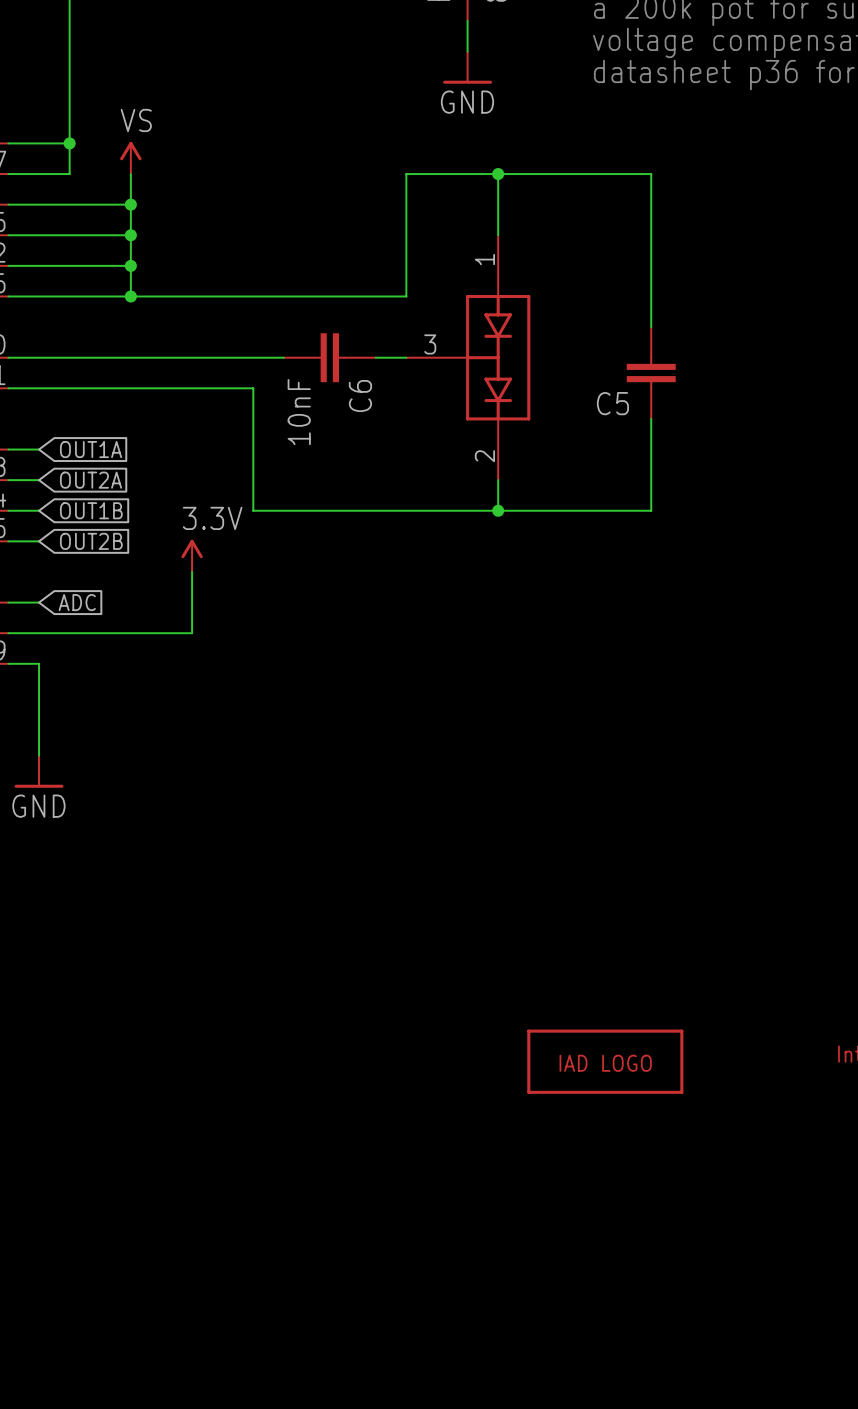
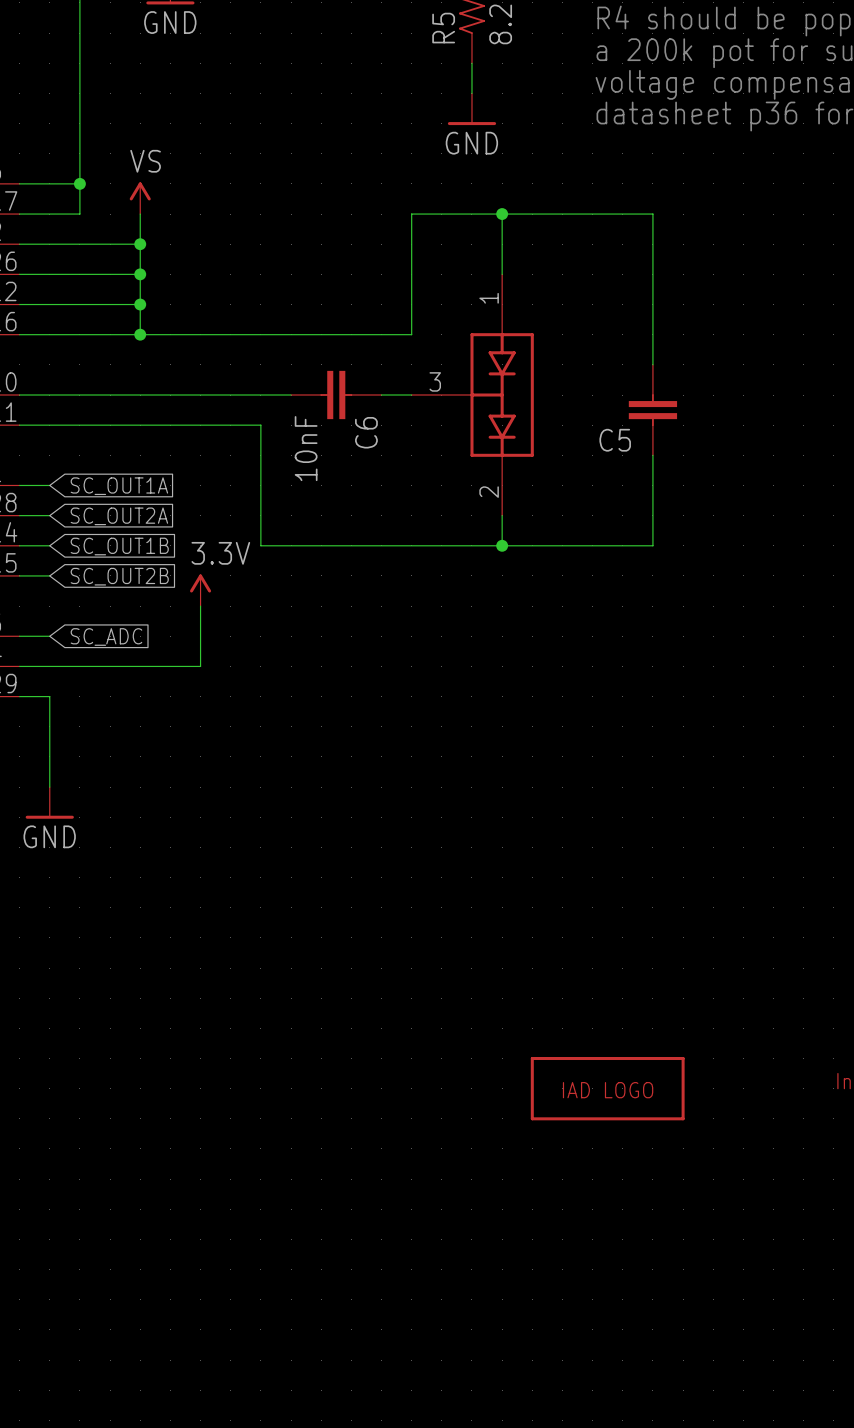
global label: OUT1A (91, 449) -> SC_OUT1A (119, 486)
global label: OUT2A (91, 480) -> SC_OUT2A (119, 516)
global label: OUT1B (91, 510) -> SC_OUT1B (119, 546)
global label: OUT2B (91, 541) -> SC_OUT2B (119, 576)
global label: ADC (77, 602) -> SC_ADC (106, 636)

